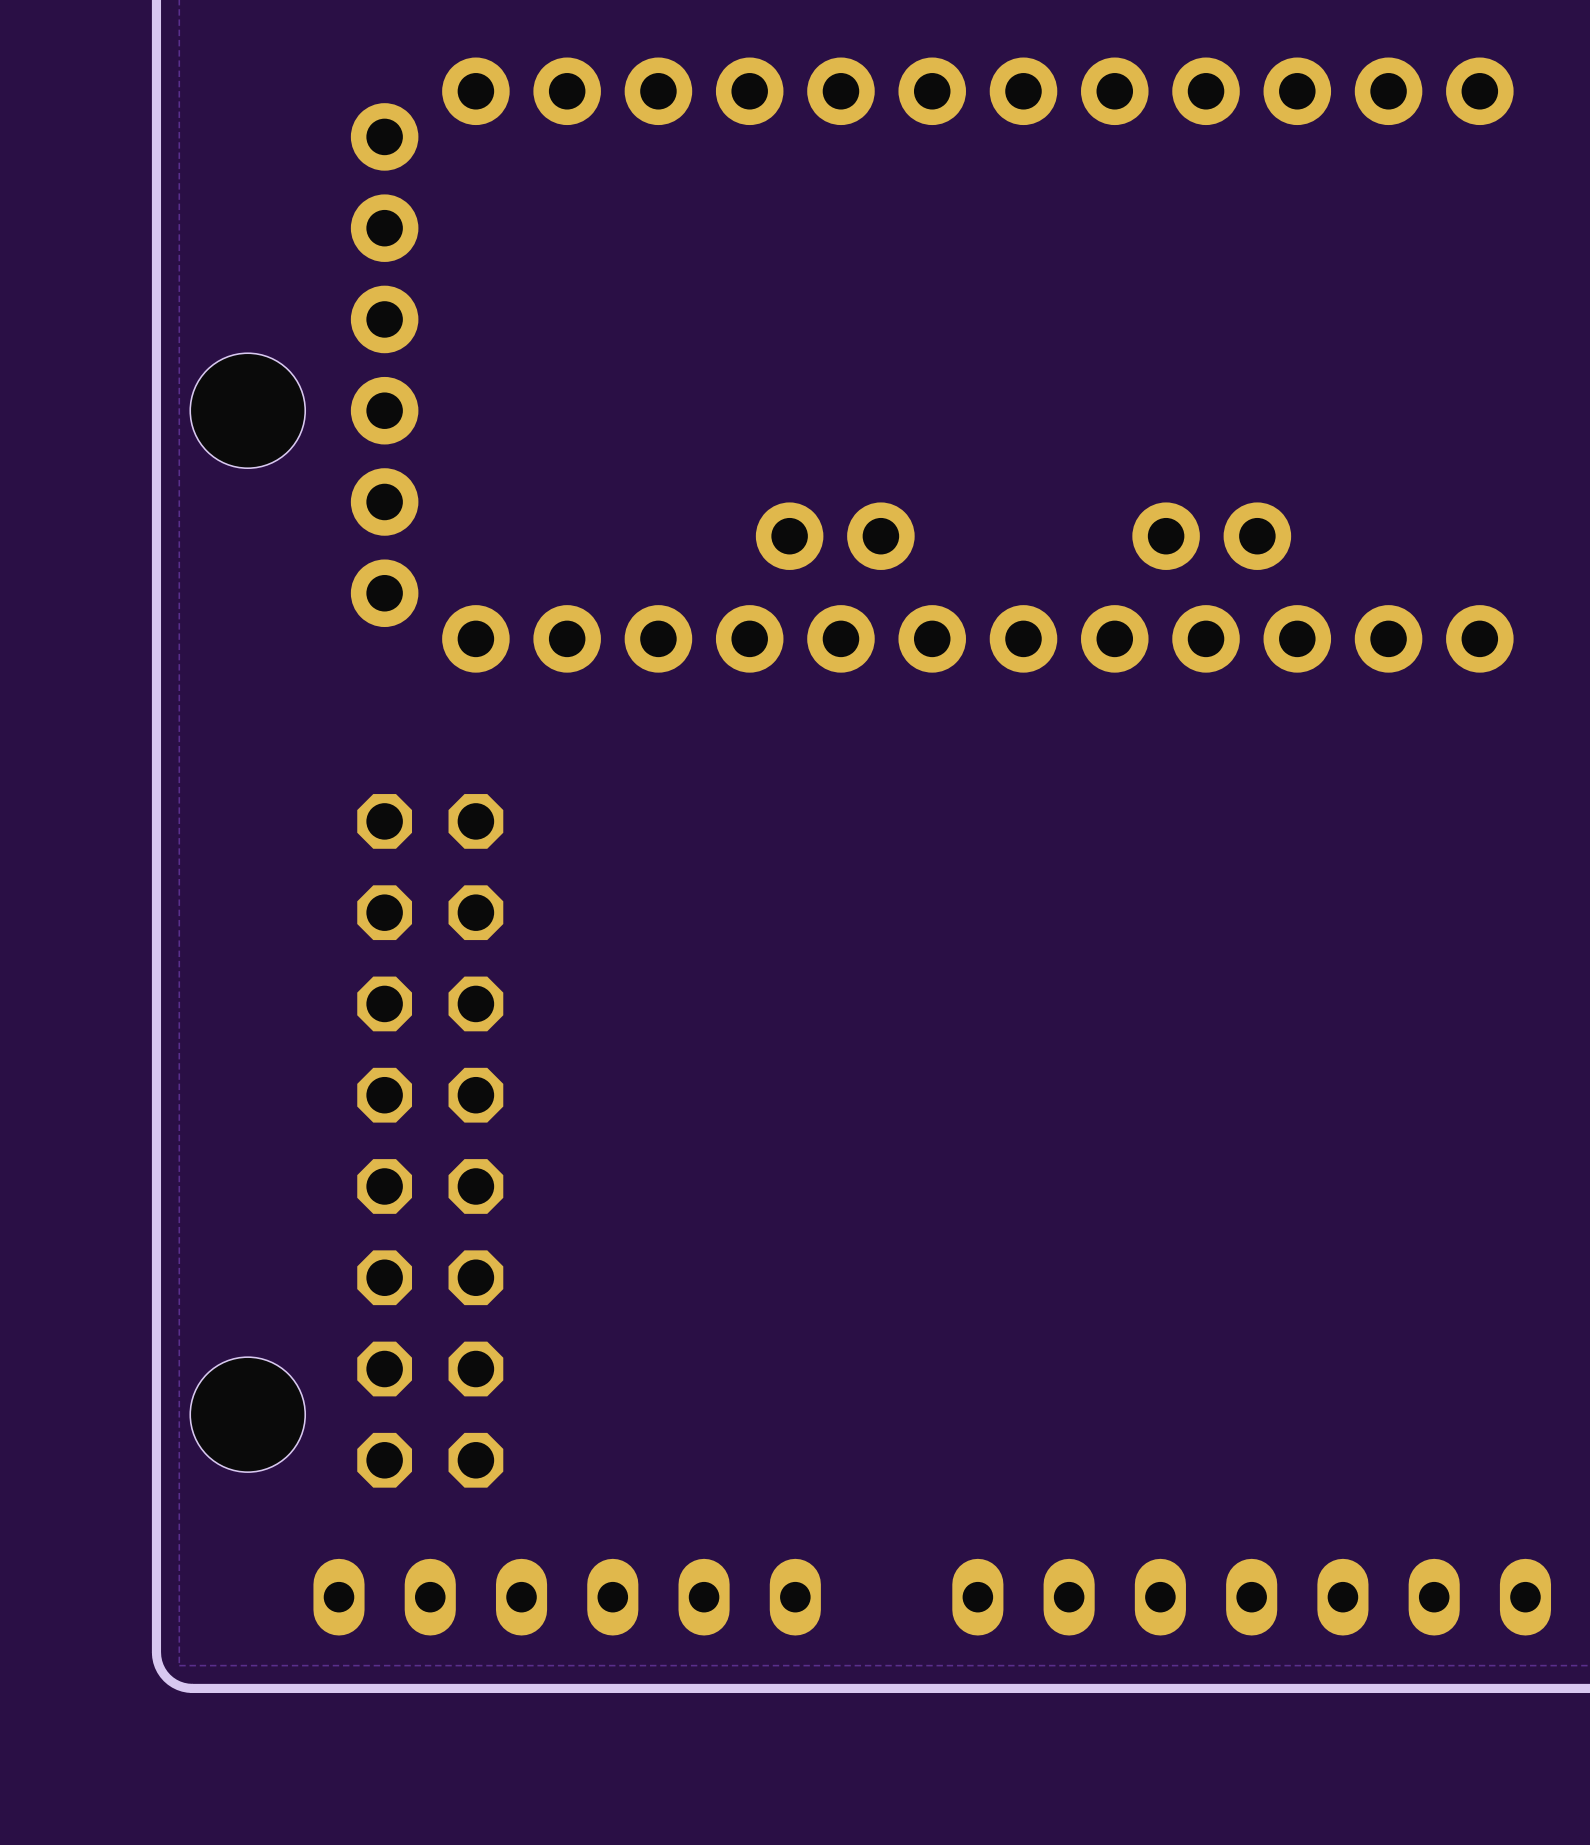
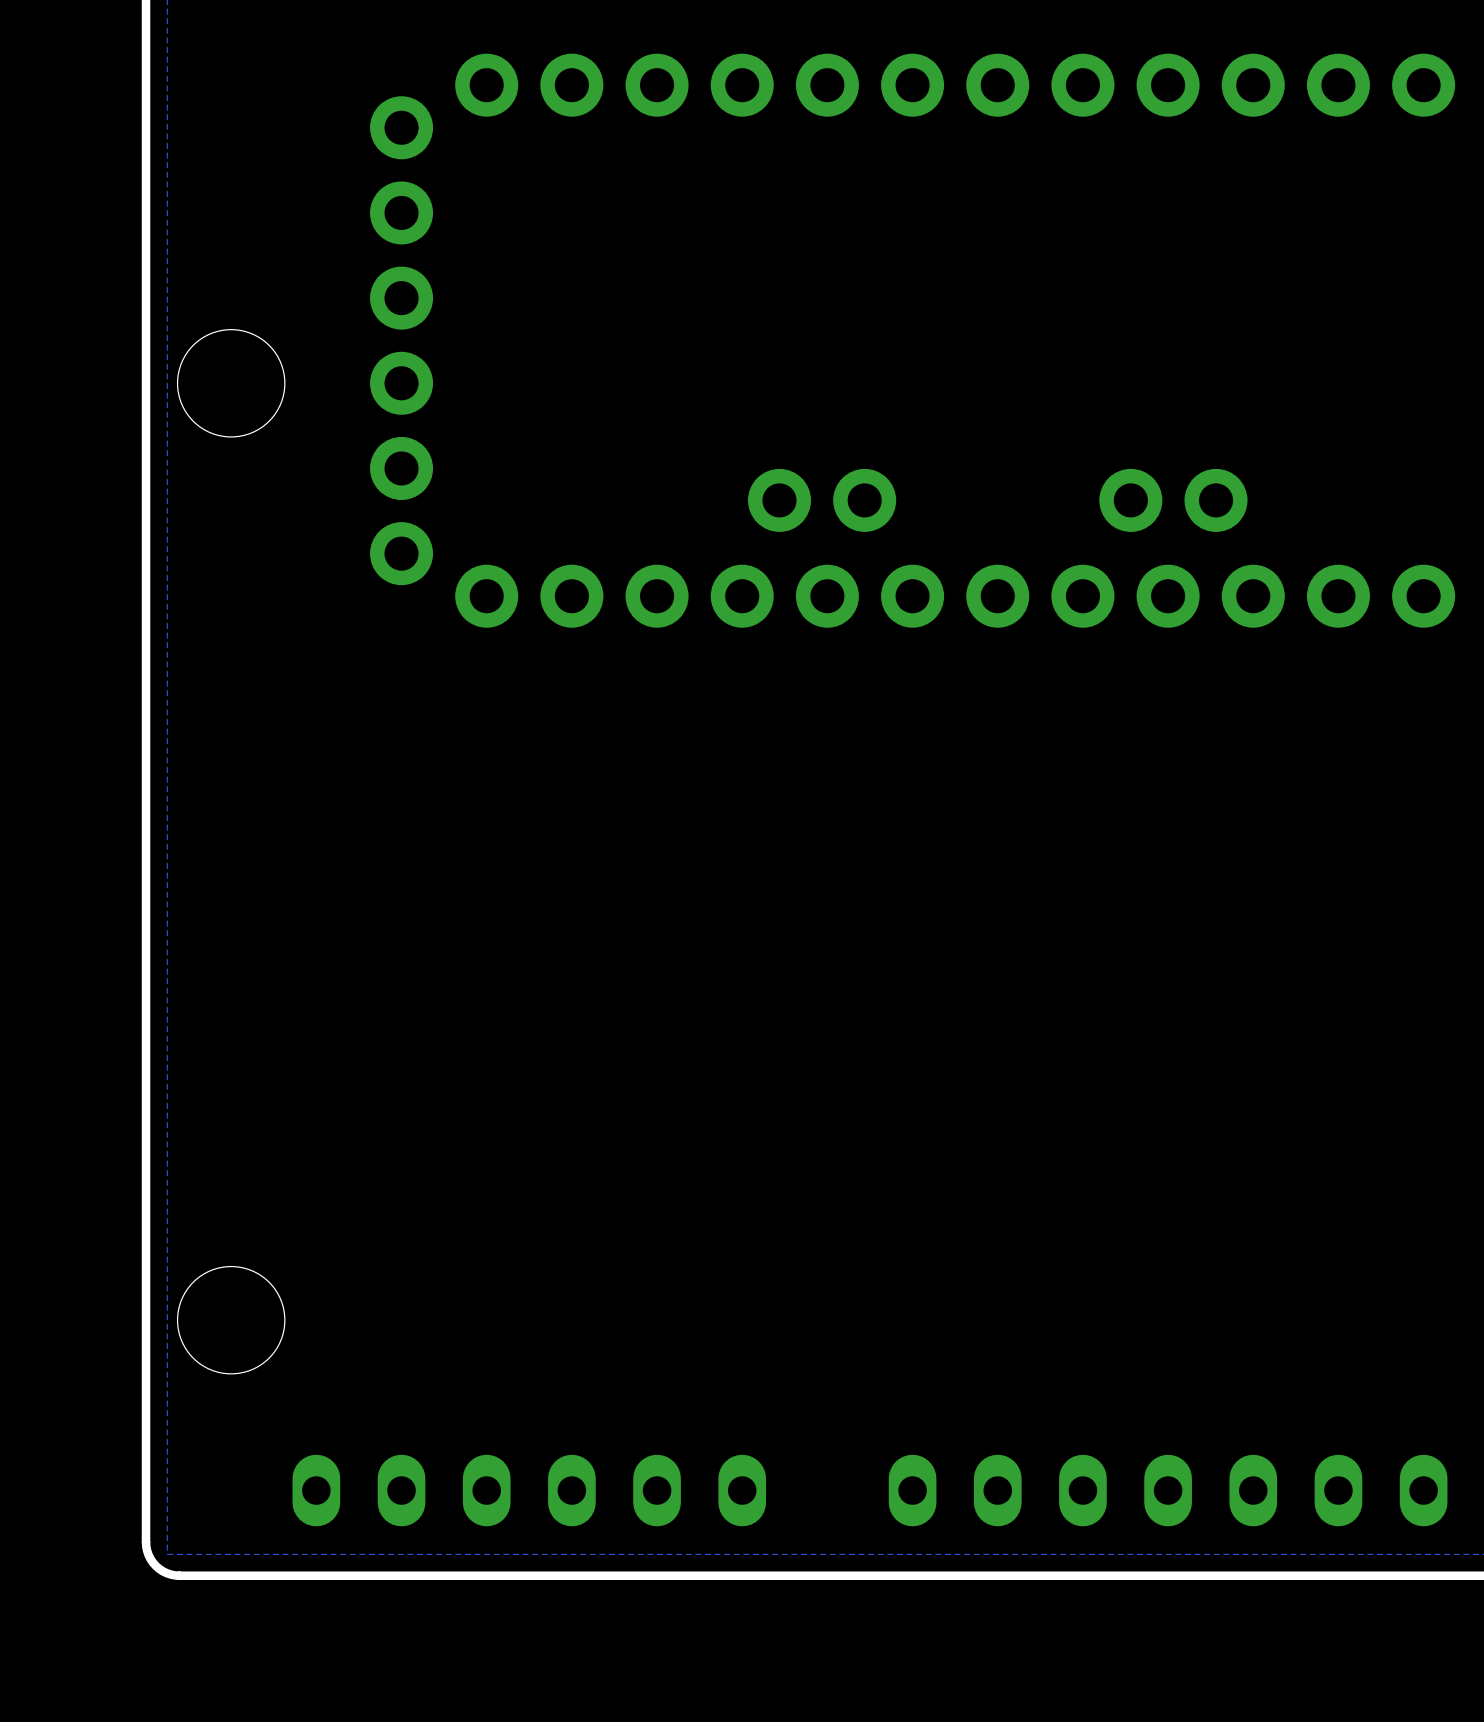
part position: (932, 365) -> (912, 340)
part: (430, 1140) -> none

